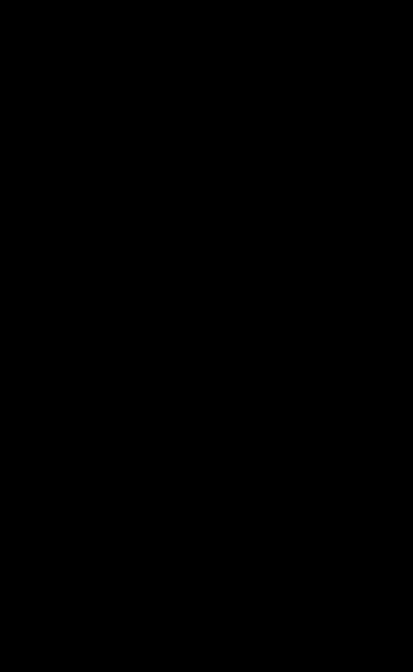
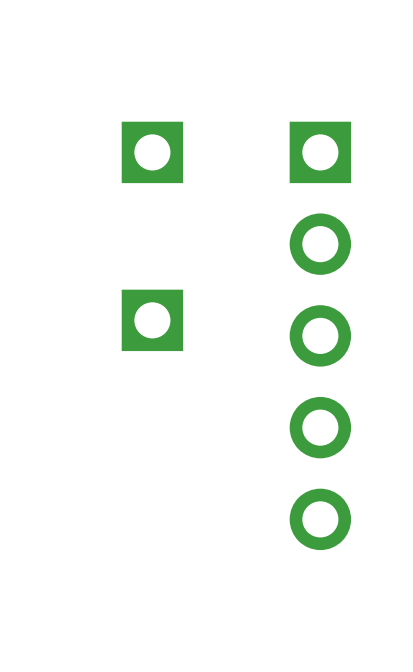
part: none -> (152, 152)
part: none -> (152, 320)
part: none -> (320, 335)

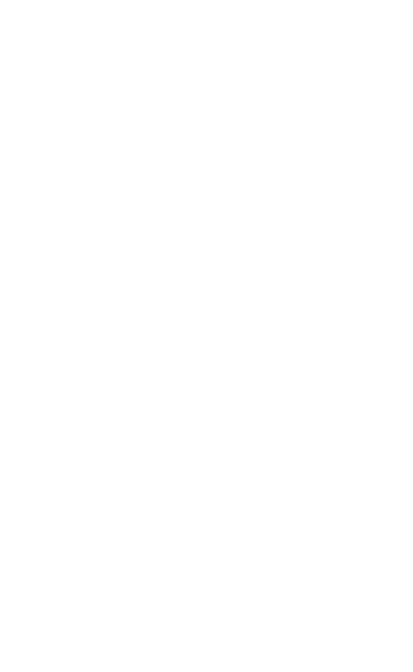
part: (152, 152) -> none
part: (152, 320) -> none
part: (320, 335) -> none

